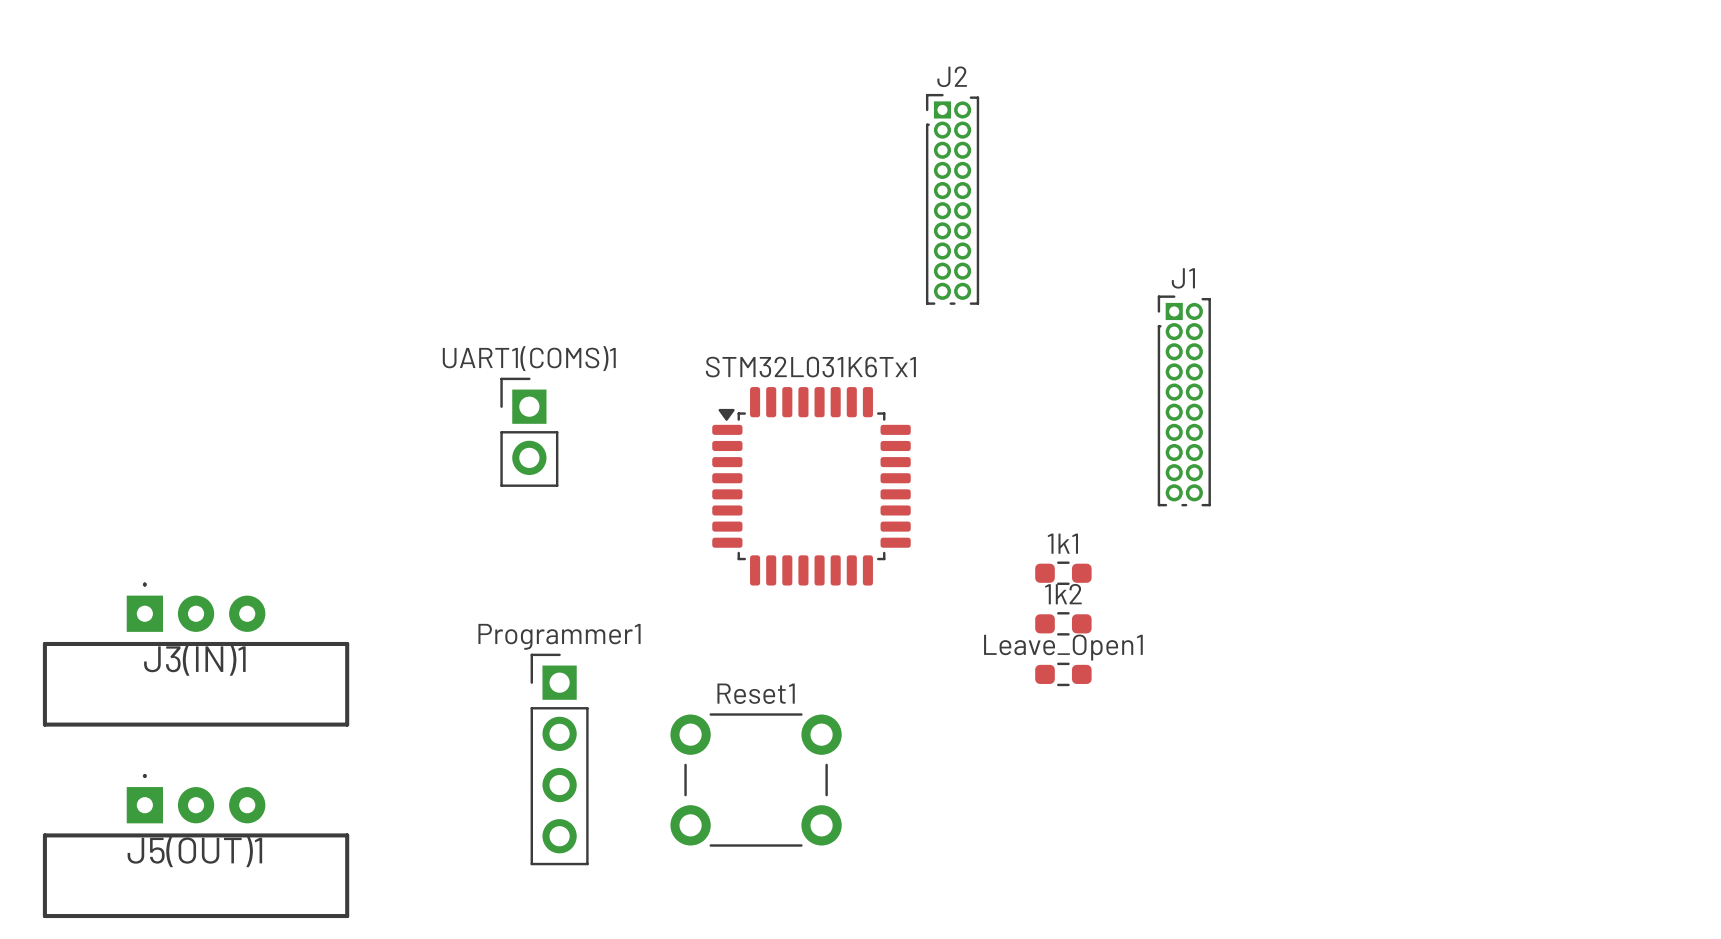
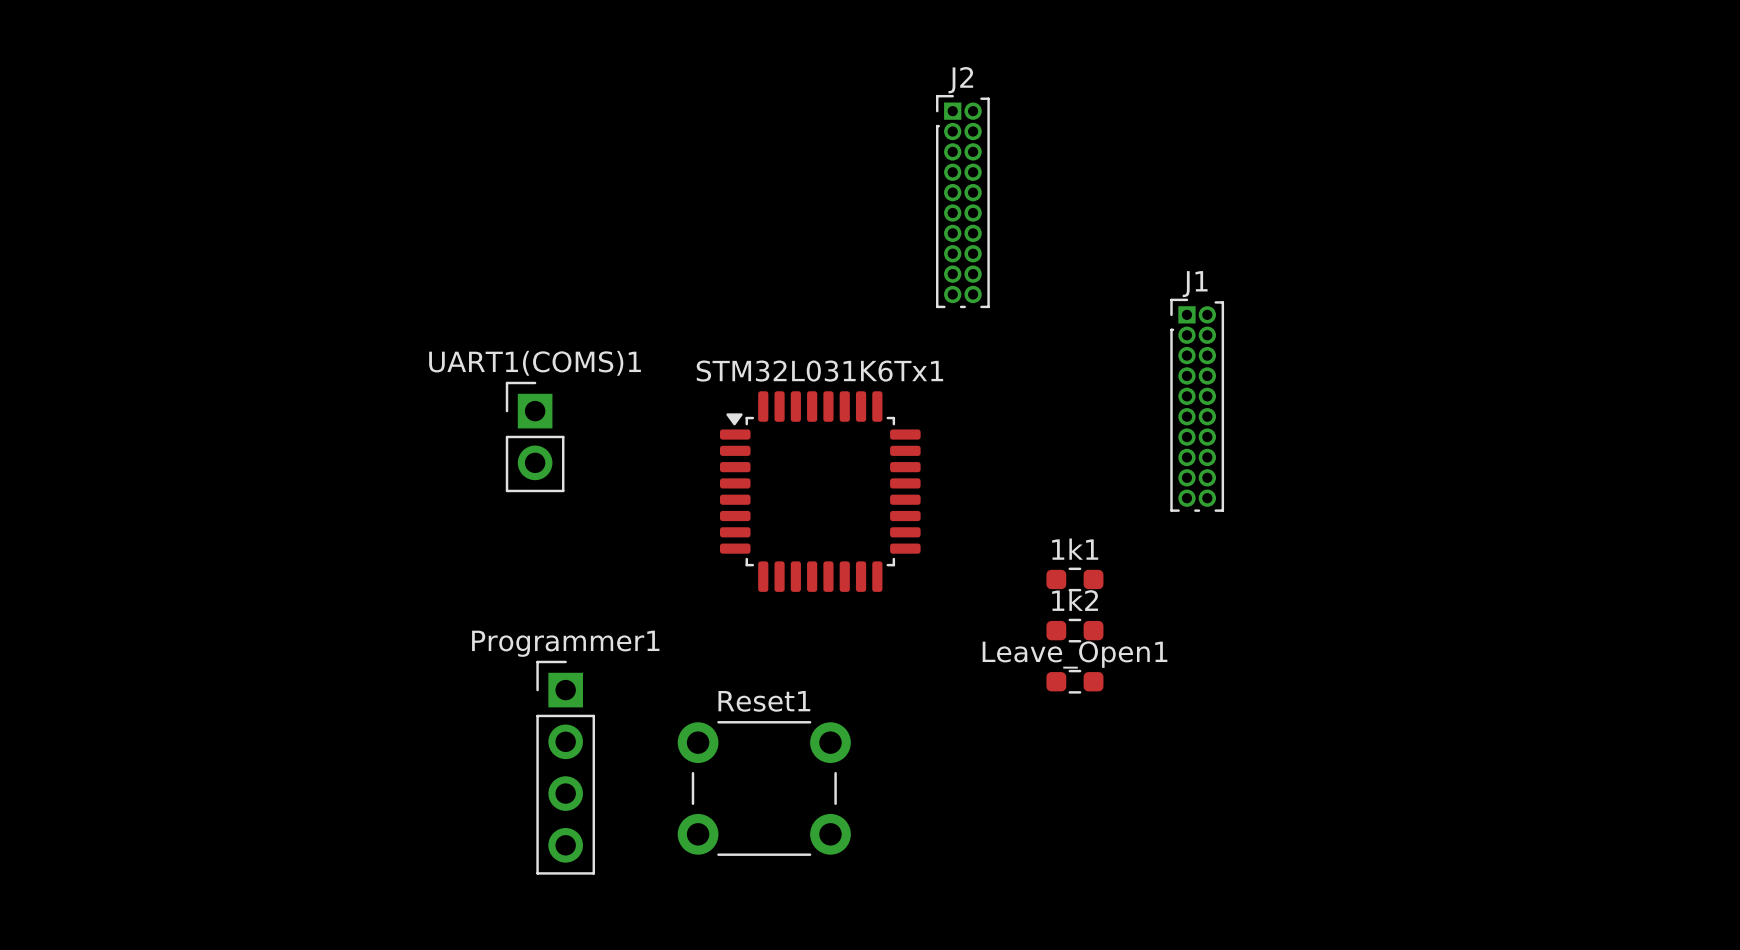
J3(IN)1: (196, 654) -> none
J5(OUT)1: (196, 846) -> none

